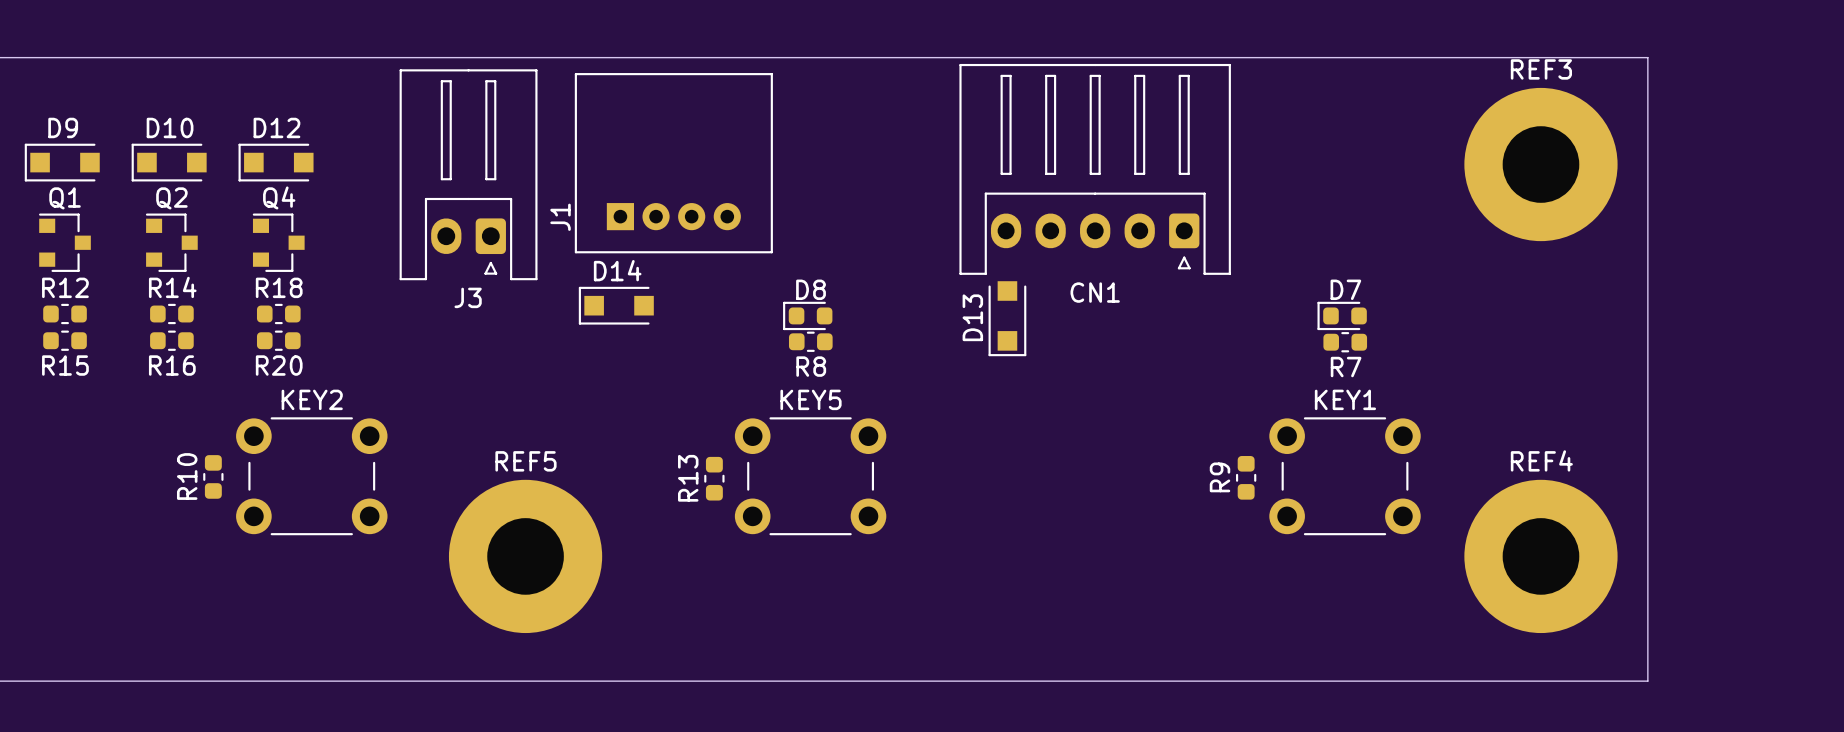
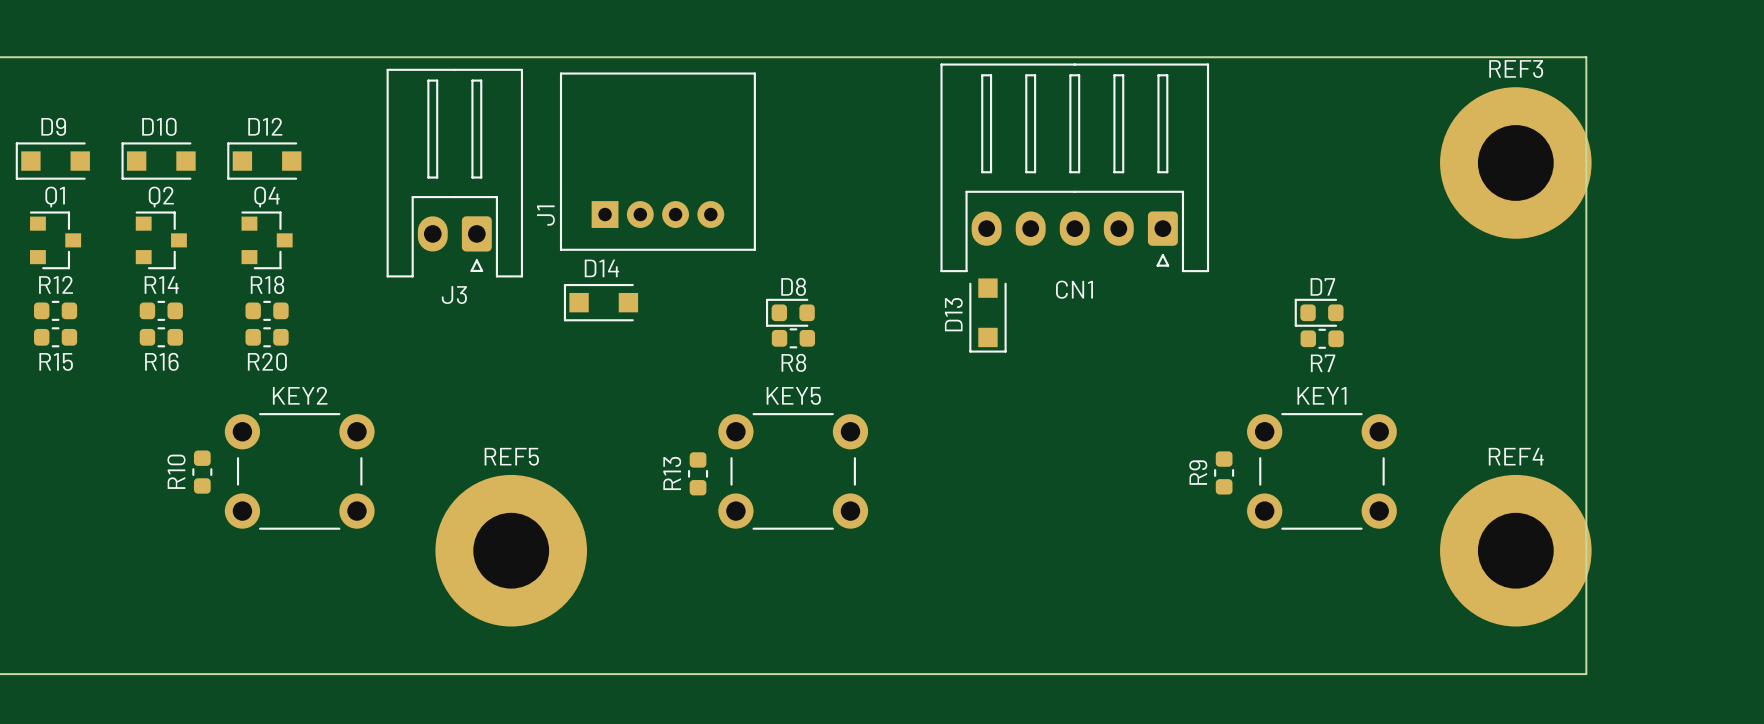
board edge: (1612, 57) (1647, 57) (1647, 681) (1612, 681) -> (1586, 57) (1586, 674)

